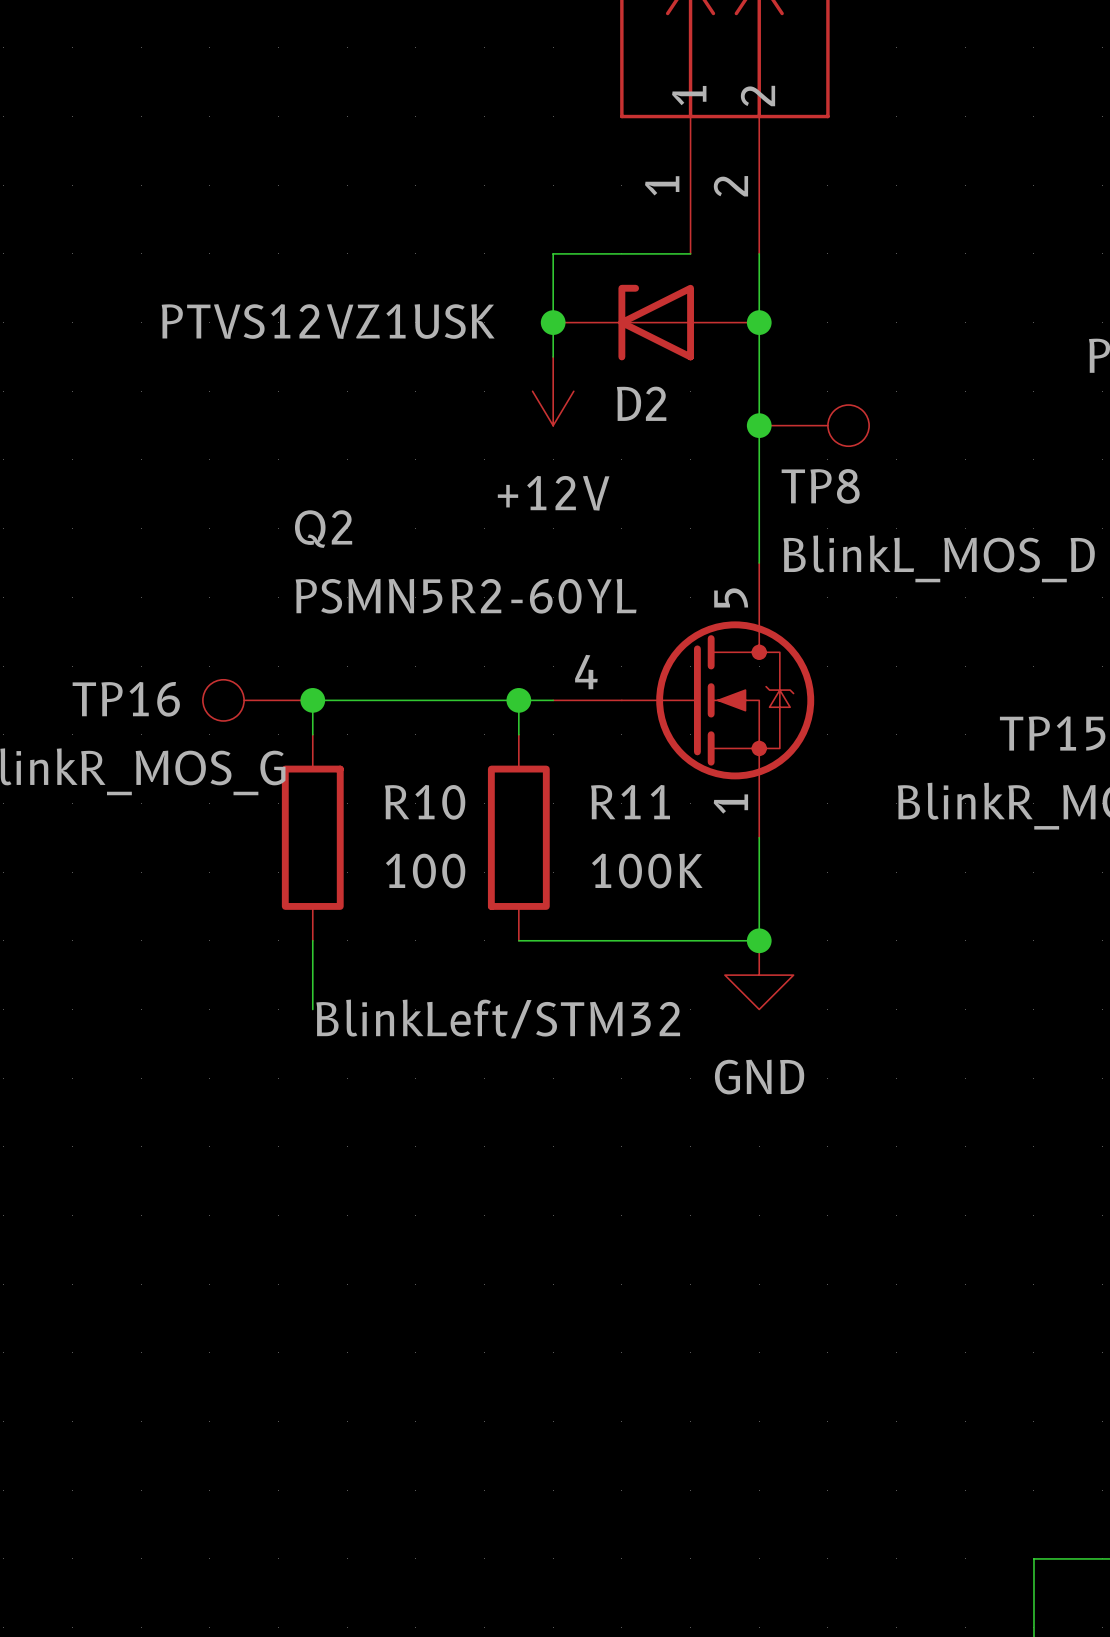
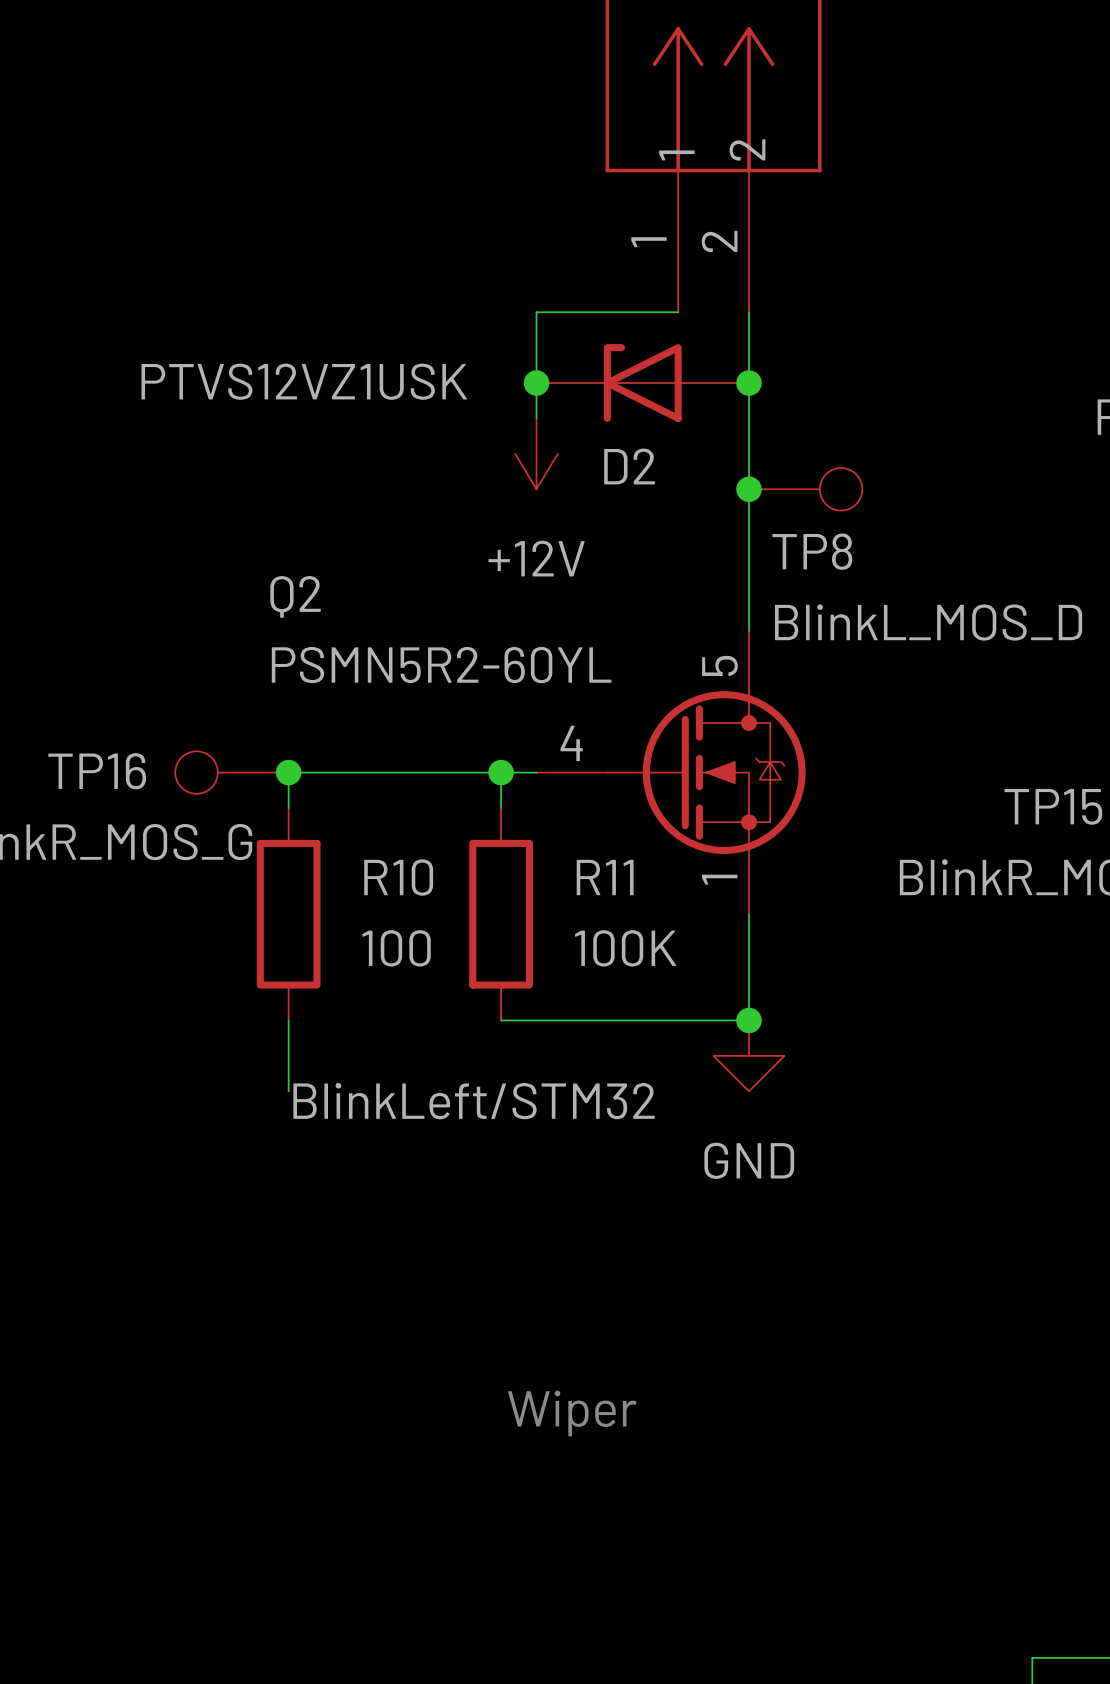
text: none -> Wiper (572, 1413)

